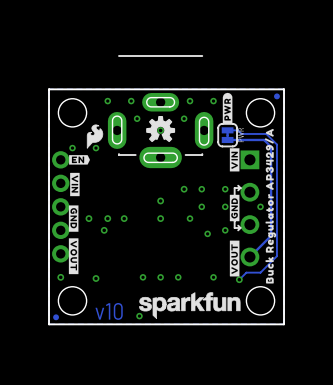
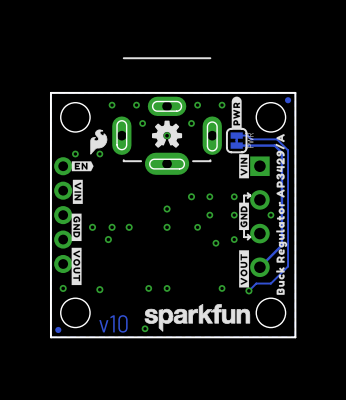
via: (178, 277) -> none

